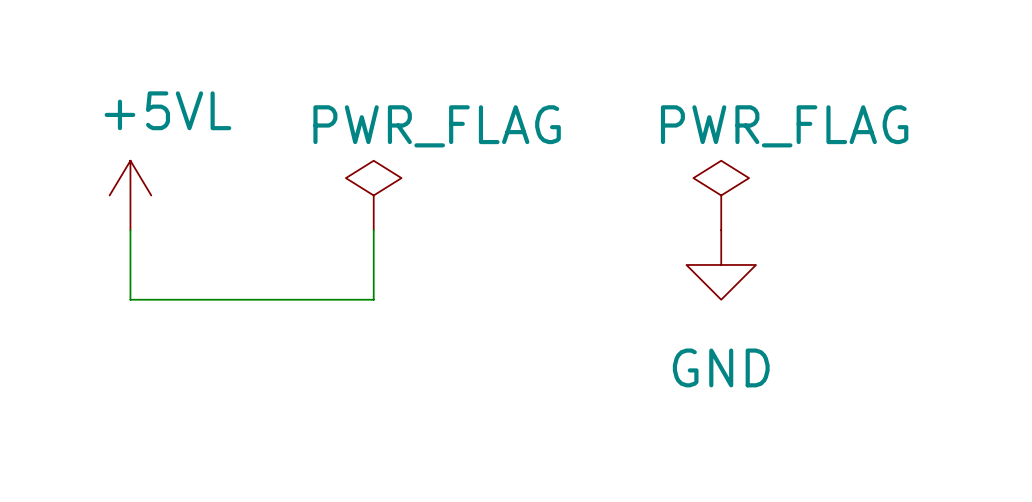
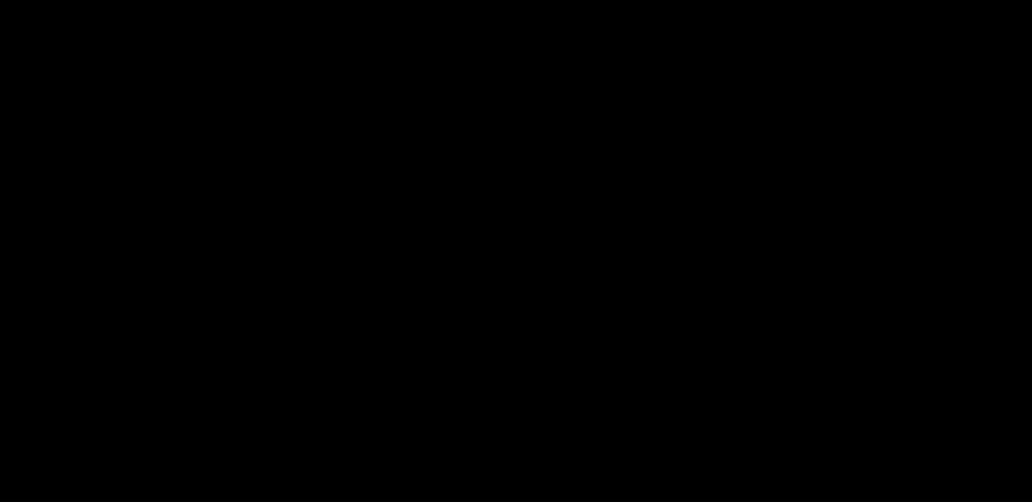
power symbol: +5VL (130, 195) -> none
power symbol: PWR_FLAG (373, 195) -> none
power symbol: PWR_FLAG (721, 195) -> none
wire: (130, 230) (130, 299) (373, 299) (373, 230) -> none
power symbol: GND (721, 264) -> none

